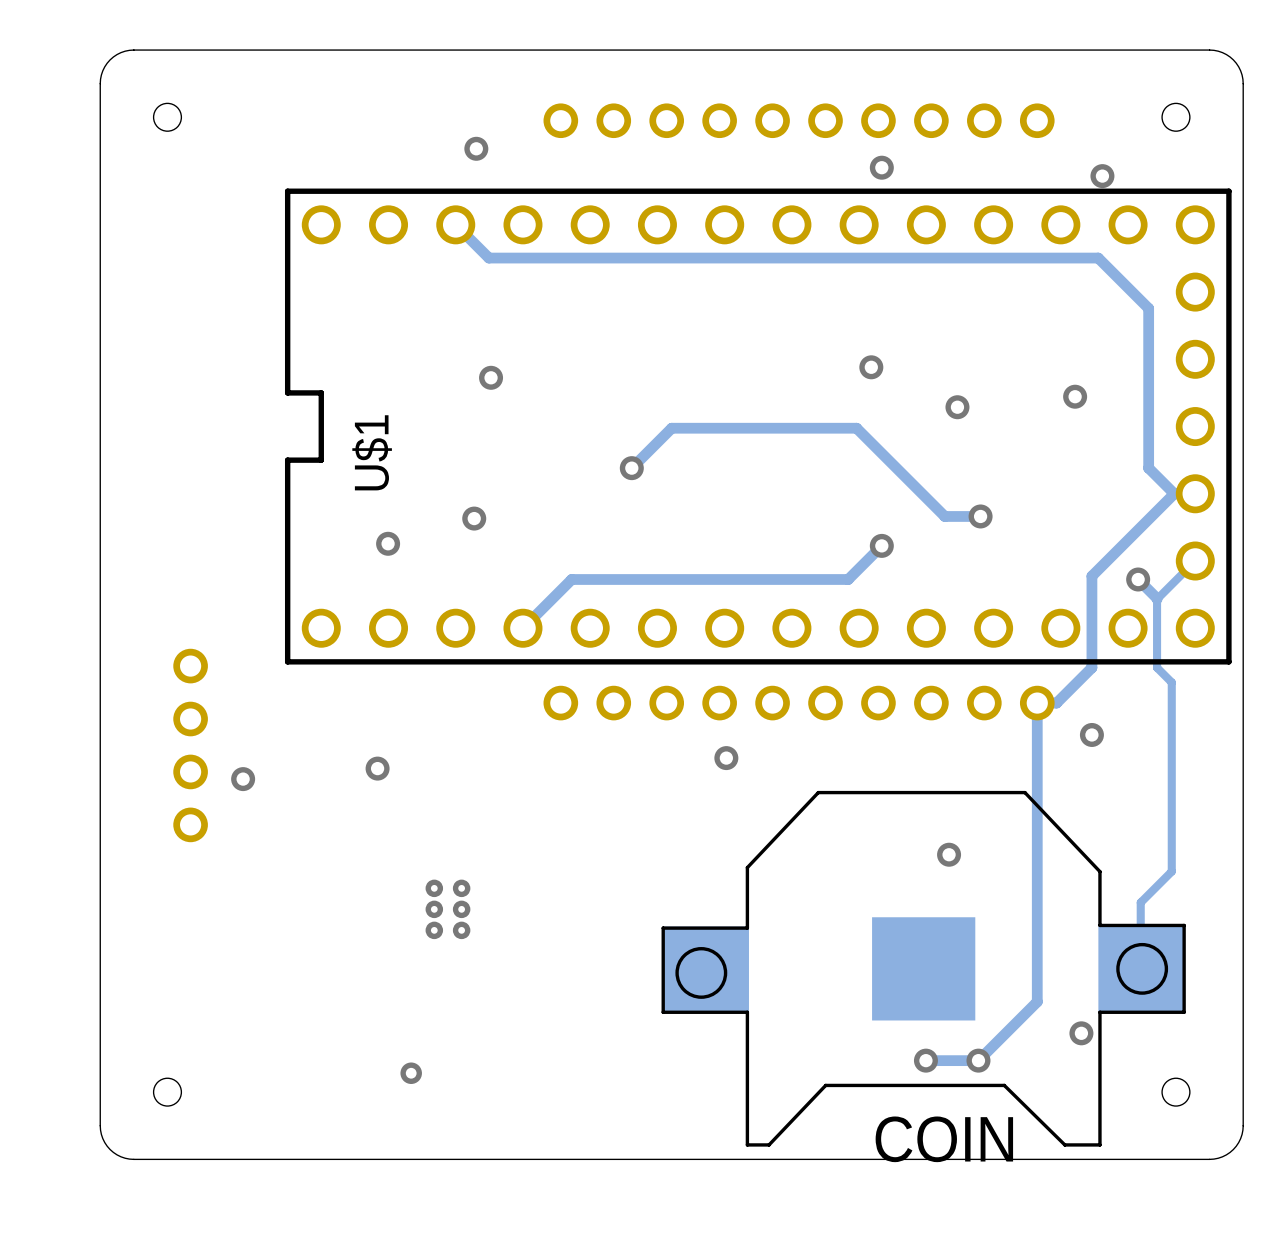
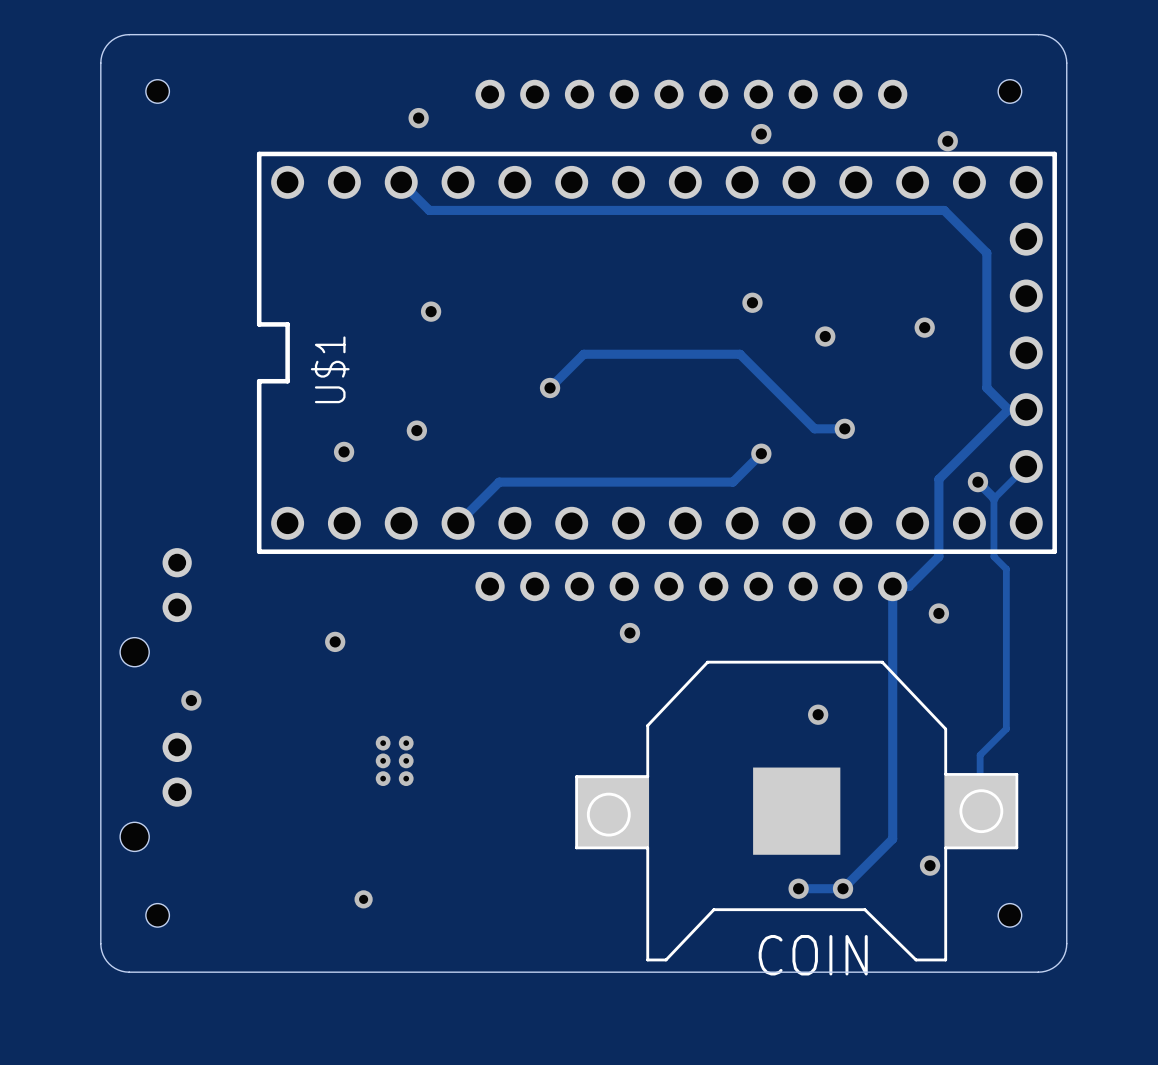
part: none -> (155, 607)
part: (190, 745) -> none
via position: (243, 779) -> (191, 700)
part: none -> (155, 792)

